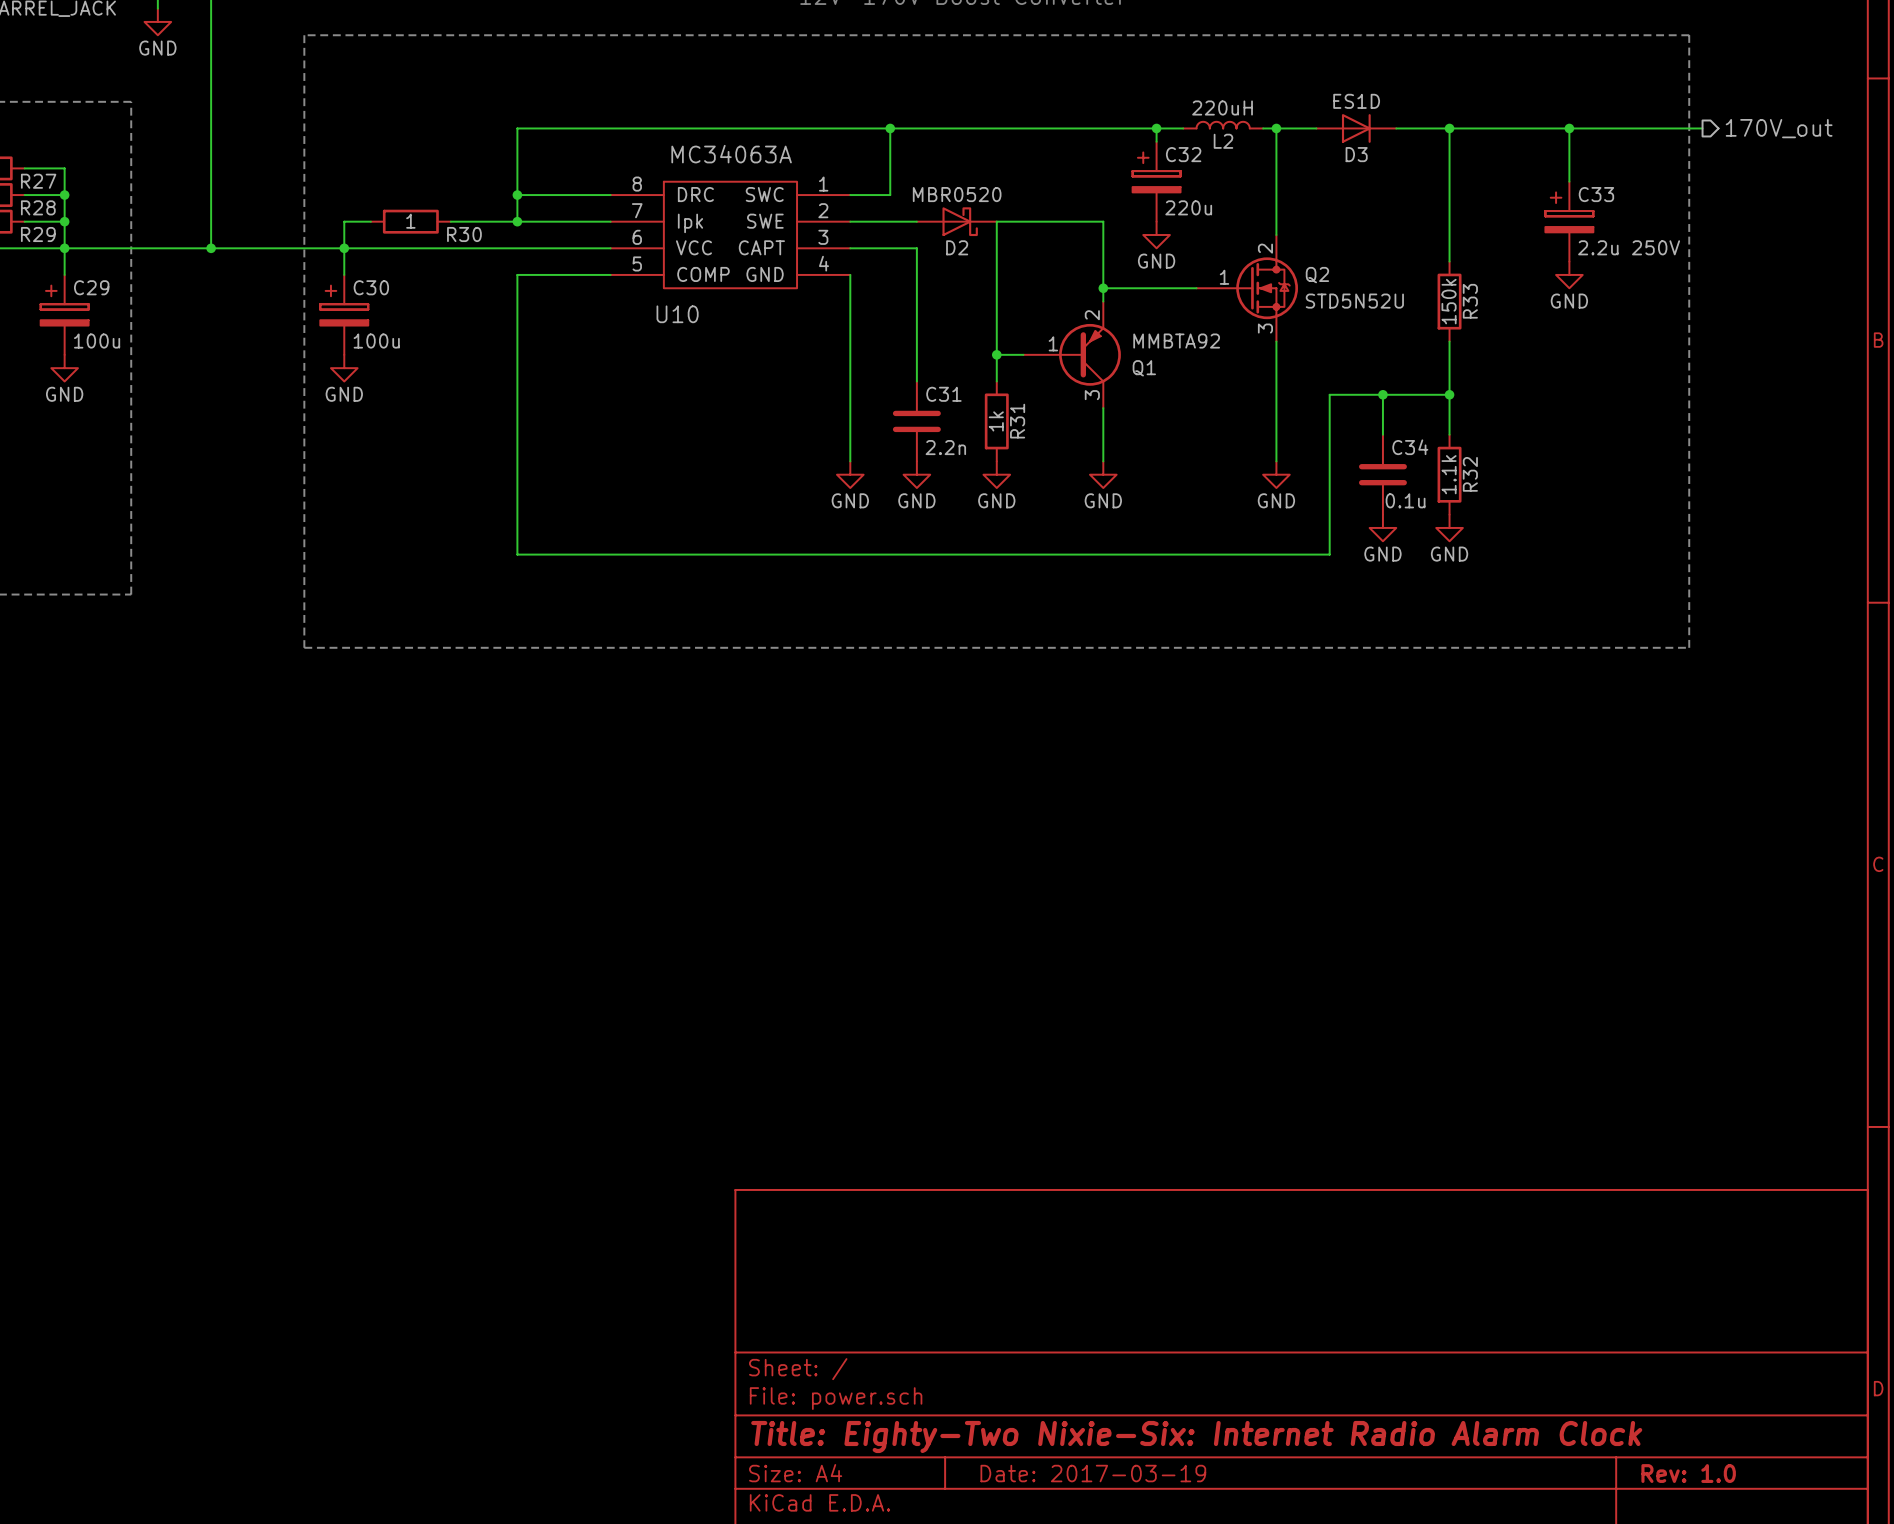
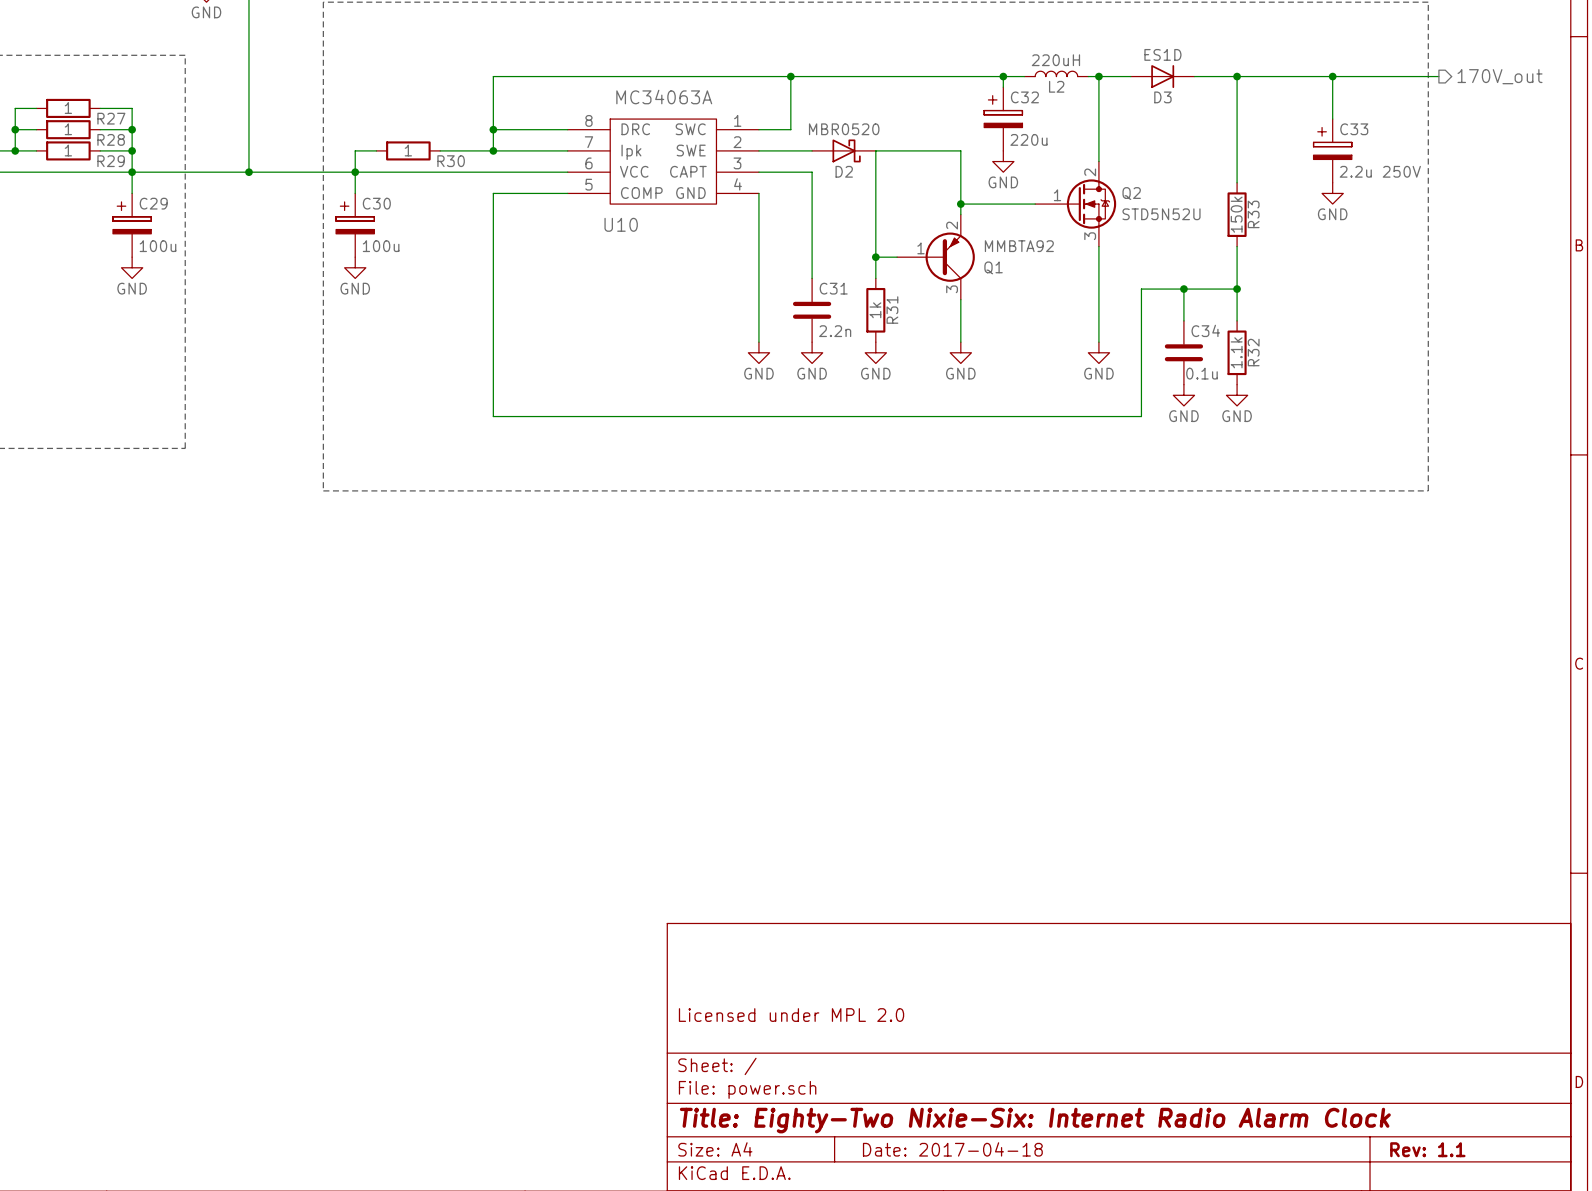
title block: none -> Licensed under MPL 2.0 (791, 1015)
title block: Date: 2017-03-19 (1093, 1473) -> Date: 2017-04-18 (952, 1149)
title block: Rev: 1.0 (1688, 1473) -> Rev: 1.1 (1427, 1149)

